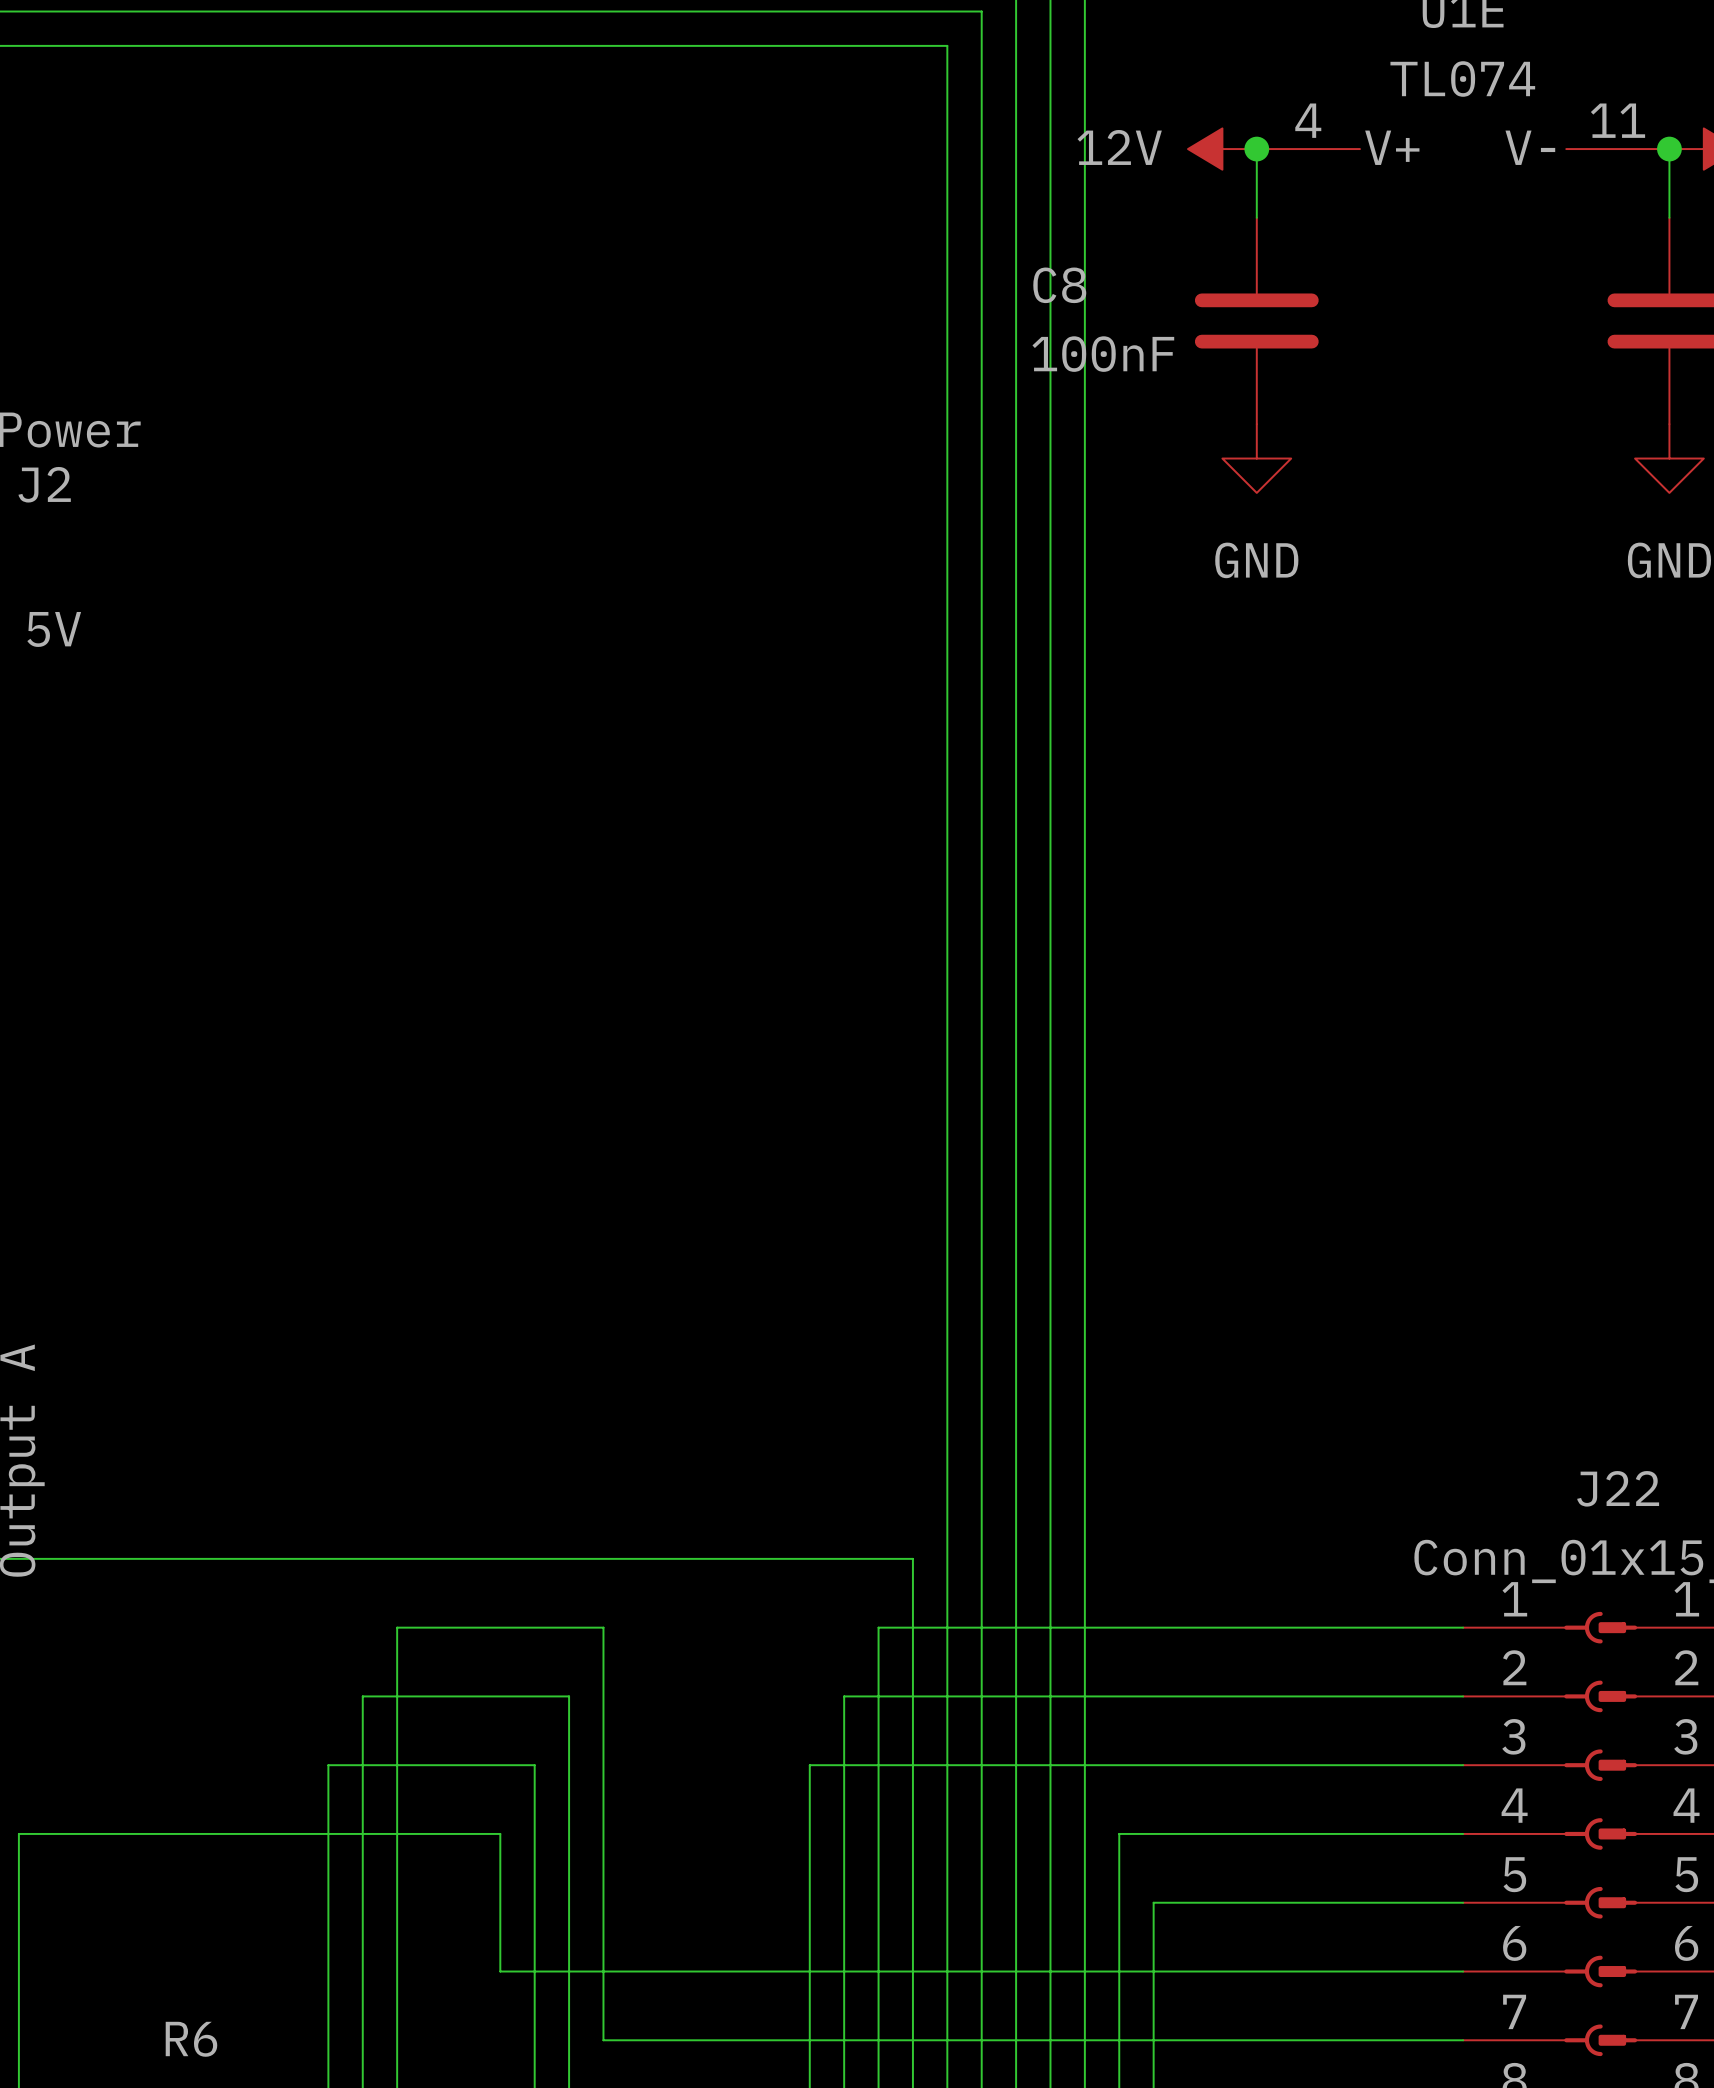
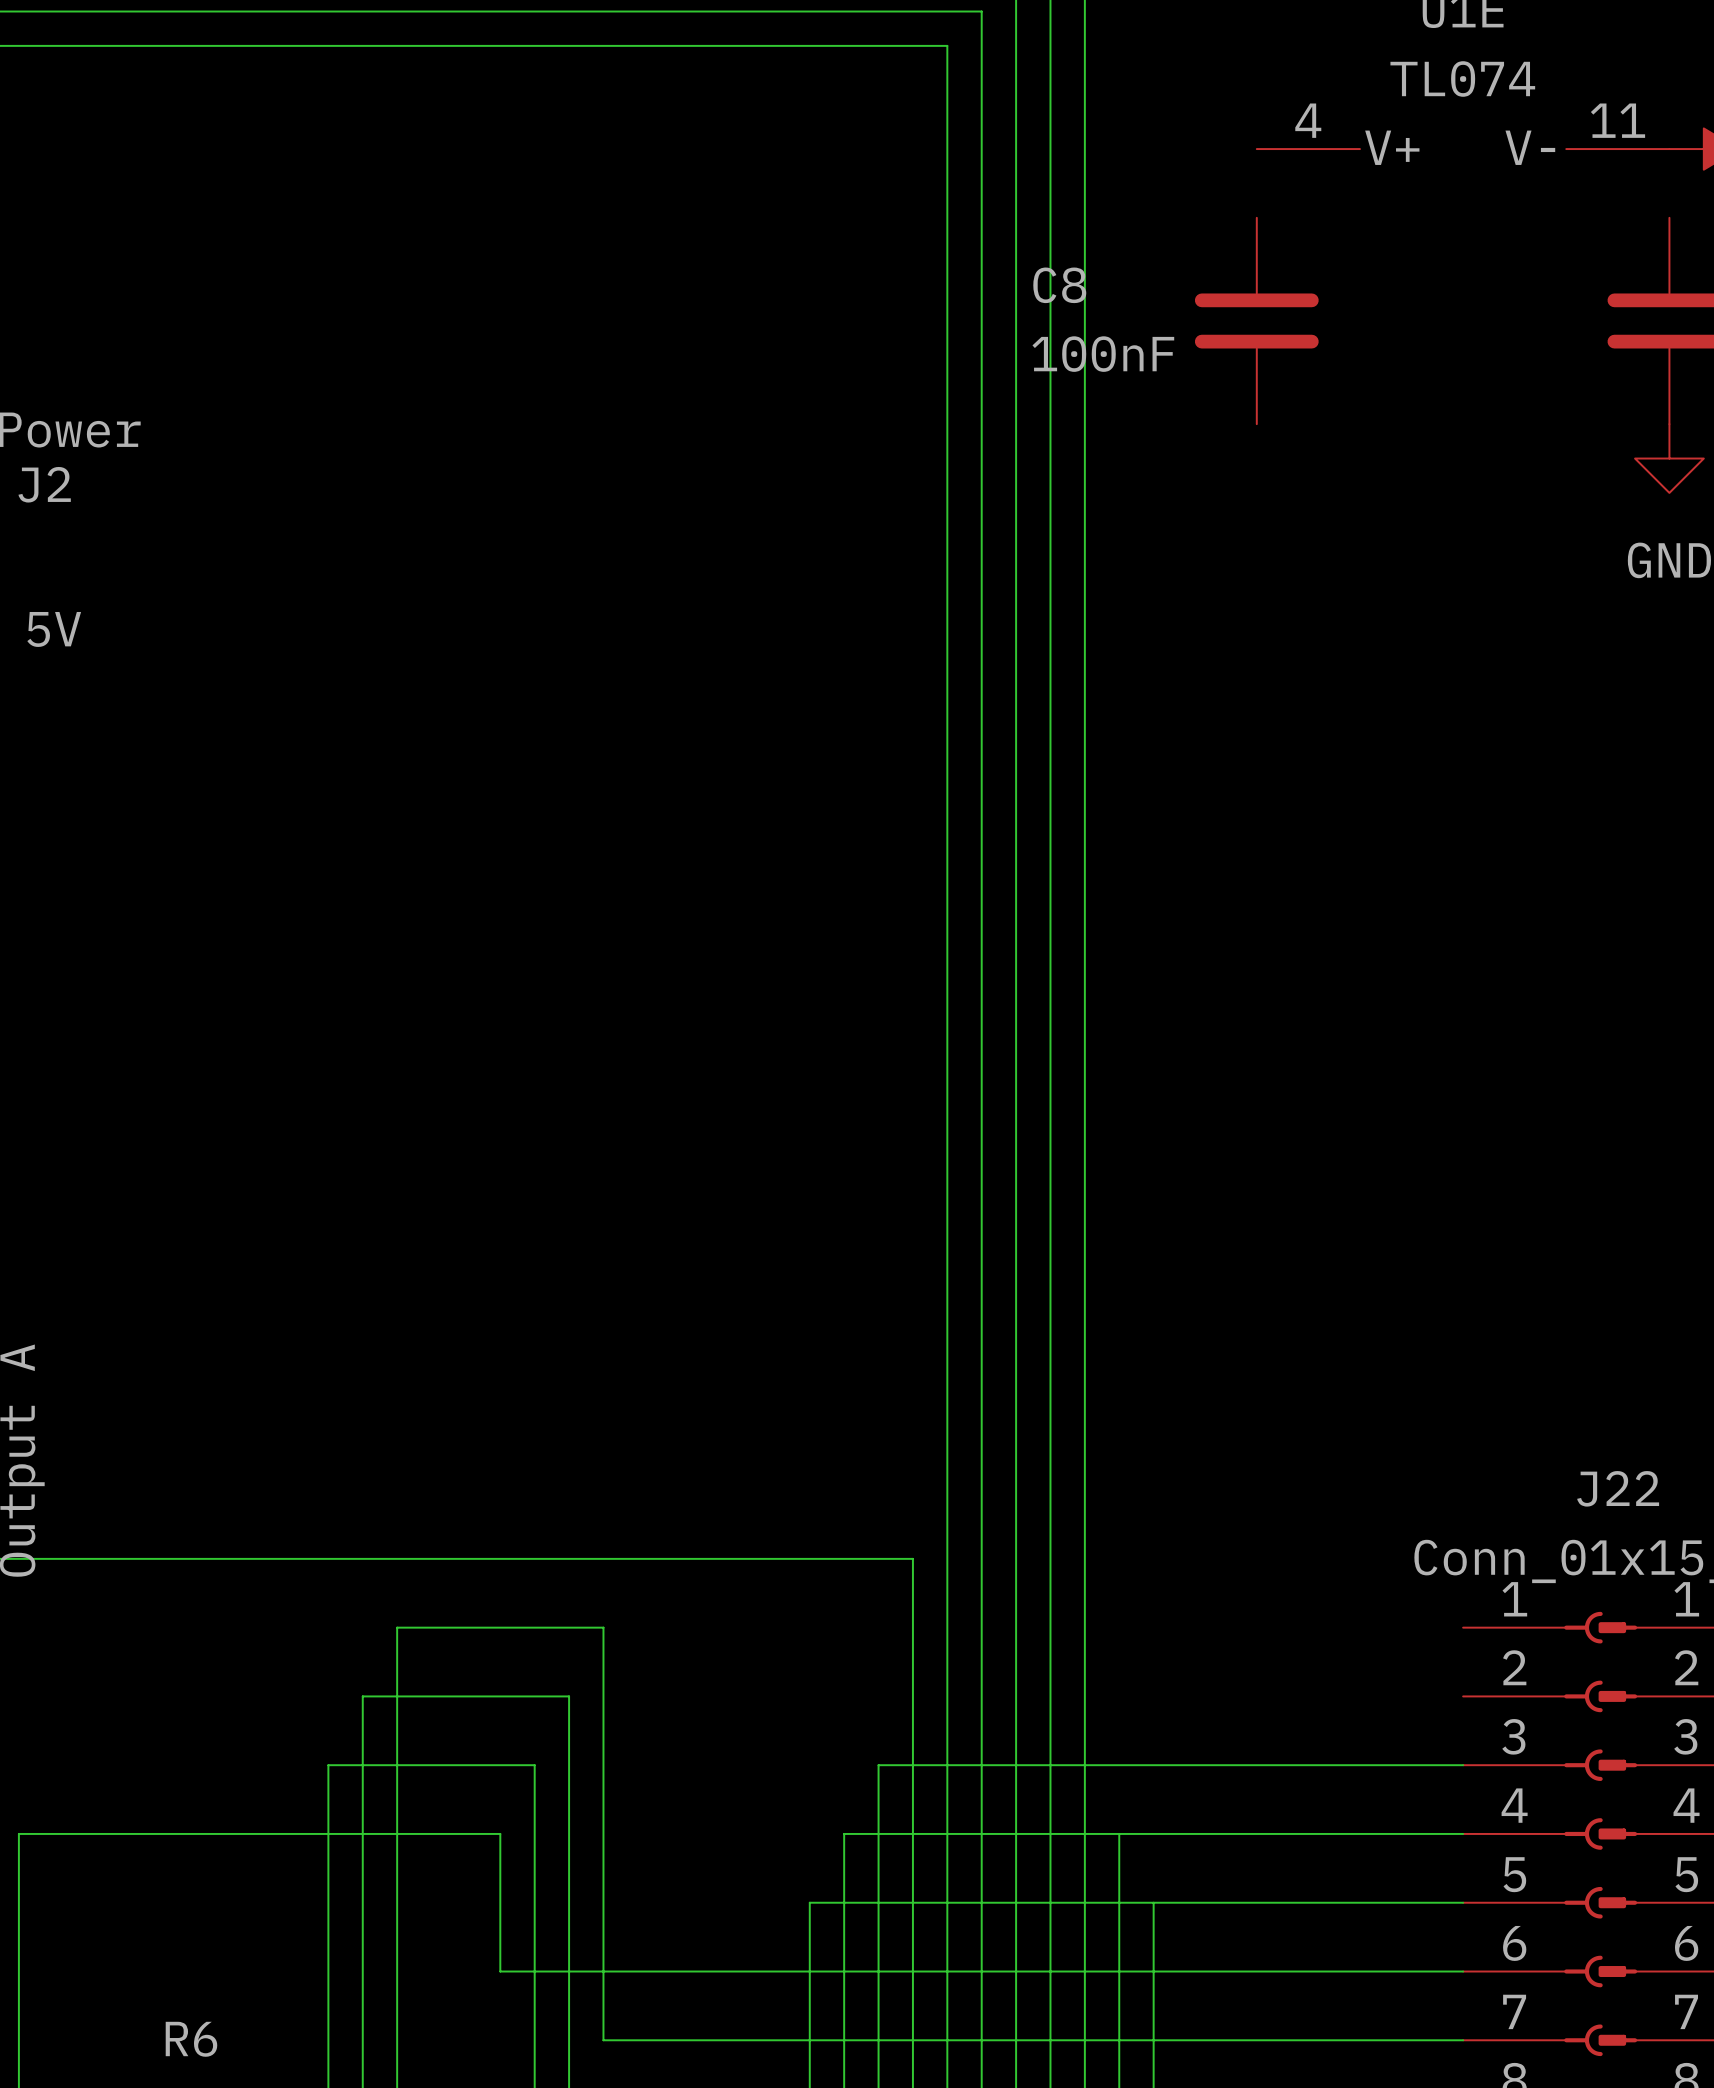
power symbol: 12V (1222, 149) -> none
wire: (1256, 149) (1256, 217) -> none
junction: (1256, 149) -> none
wire: (1669, 149) (1669, 217) -> none
junction: (1669, 149) -> none
power symbol: GND (1256, 458) -> none
wire: (1463, 1627) (878, 1627) (878, 1765) (809, 1765) (809, 1902) -> (1153, 1902) (809, 1902)
wire: (1463, 1696) (844, 1696) (844, 1833) -> (1119, 1833) (844, 1833)

